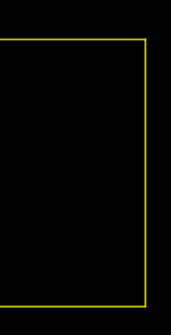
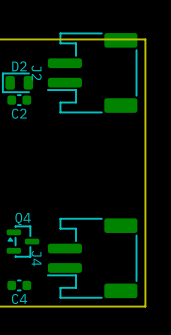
J2: none -> (92, 72)
D2: none -> (17, 82)
C2: none -> (19, 100)
Q4: none -> (22, 241)
J4: none -> (92, 258)
C4: none -> (19, 285)

